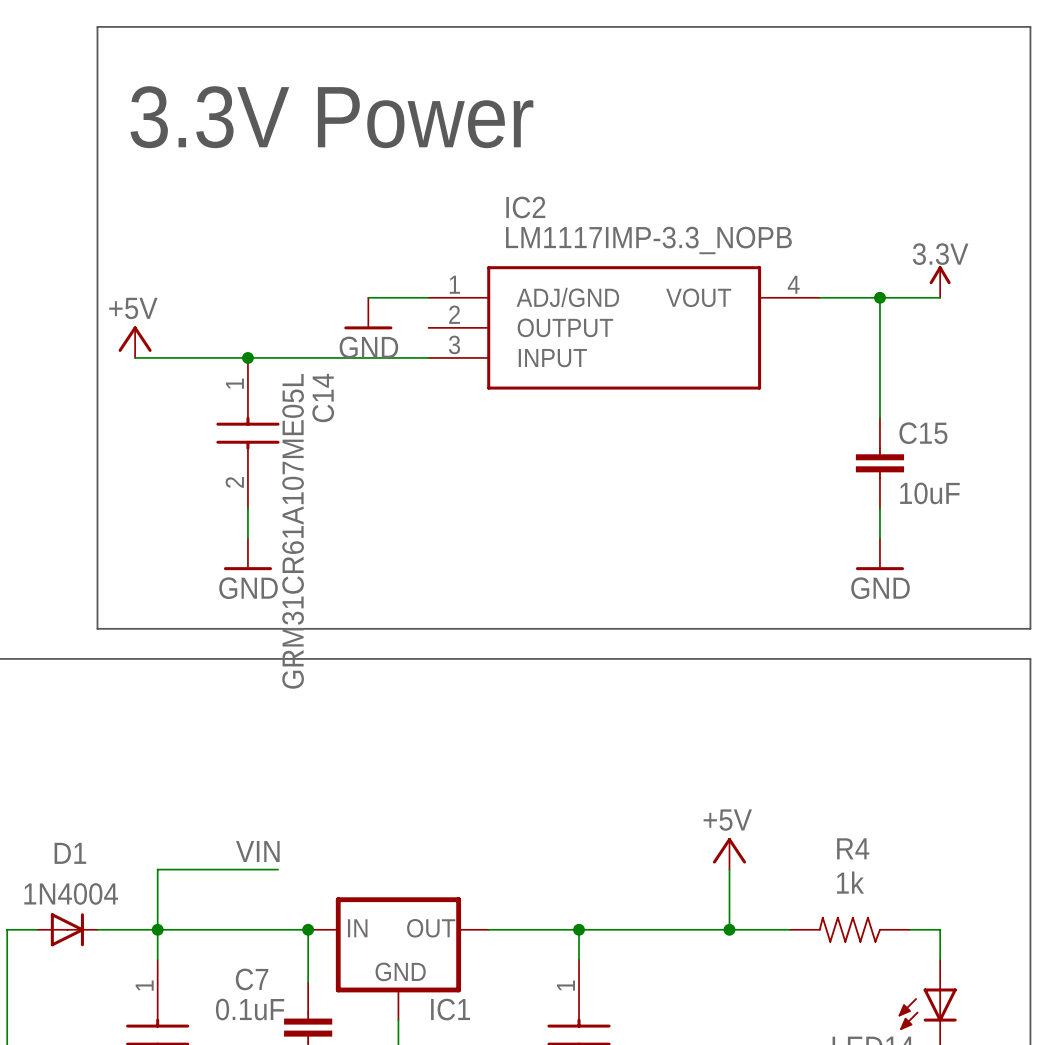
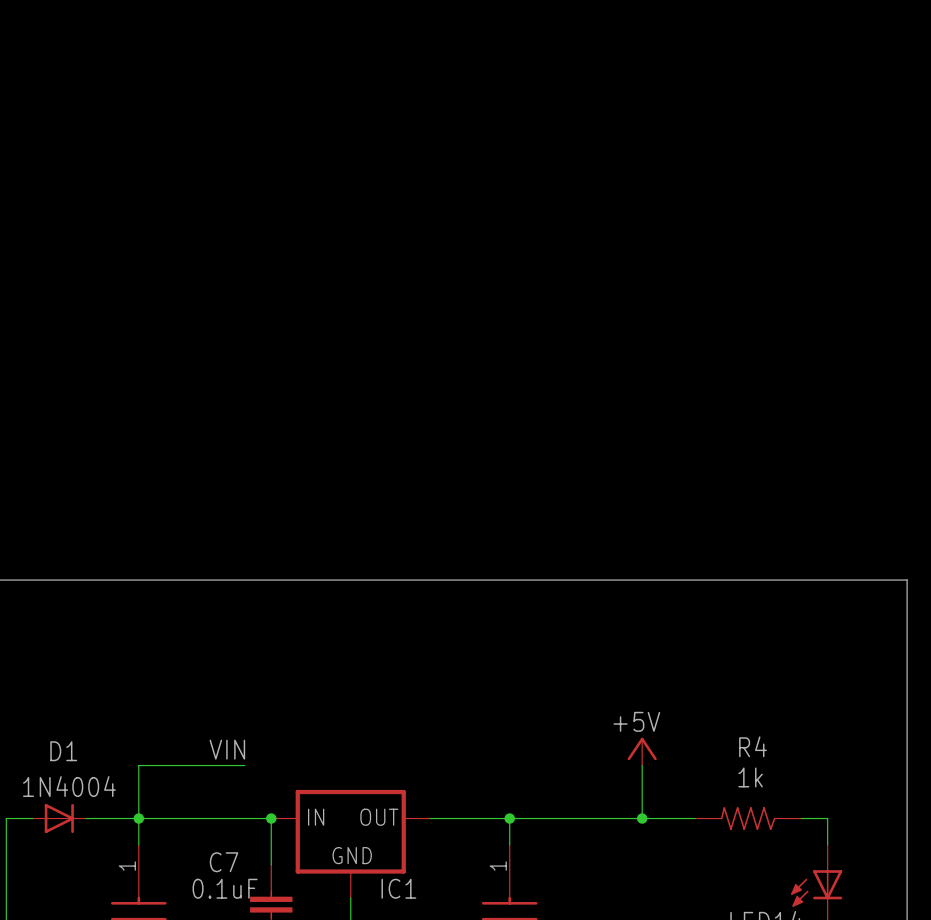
line: (97, 26) (97, 628) (1030, 628) (1030, 26) (97, 26) -> none
text: 3.3V Power (331, 117) -> none
power symbol: 3.3V (940, 281) -> none
wire: (368, 297) (428, 297) -> none
wire: (819, 297) (940, 297) -> none
wire: (879, 297) (879, 418) -> none
junction: (879, 297) -> none
power symbol: GND (368, 313) -> none
IC2: LM1117IMP-3.3_NOPB (624, 327) -> none
power symbol: +5V (135, 342) -> none
wire: (135, 357) (428, 357) -> none
junction: (247, 357) -> none
C14: GRM31CR61A107ME05L (247, 433) -> none
C15: 10uF (879, 463) -> none
wire: (247, 508) (247, 538) -> none
wire: (879, 508) (879, 538) -> none
power symbol: GND (247, 554) -> none
power symbol: GND (879, 554) -> none

